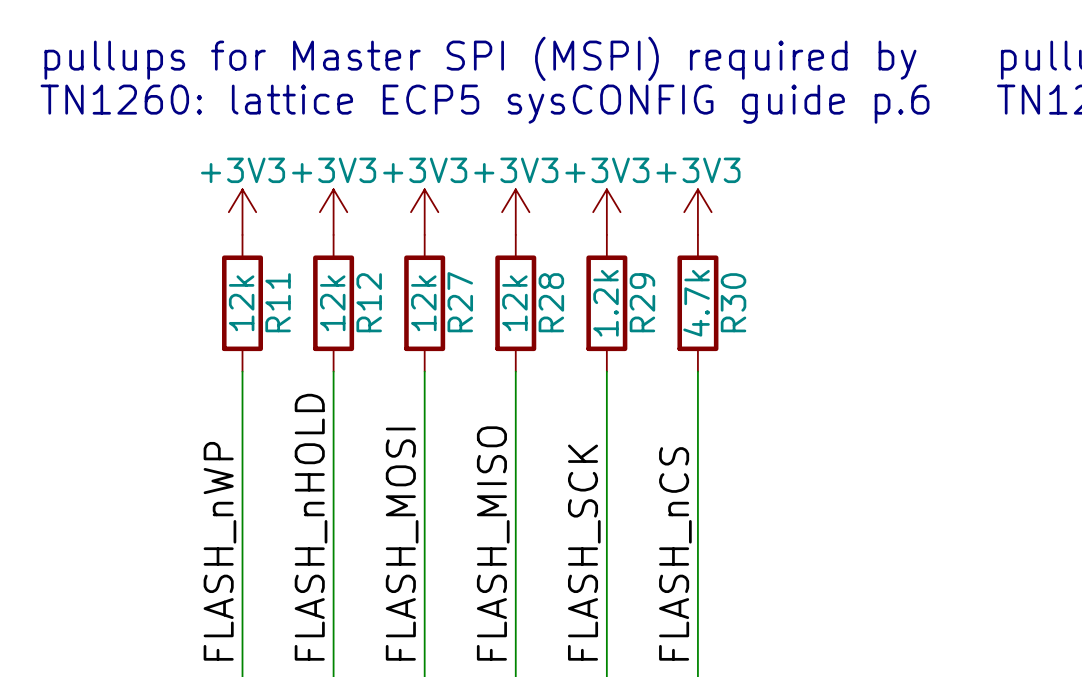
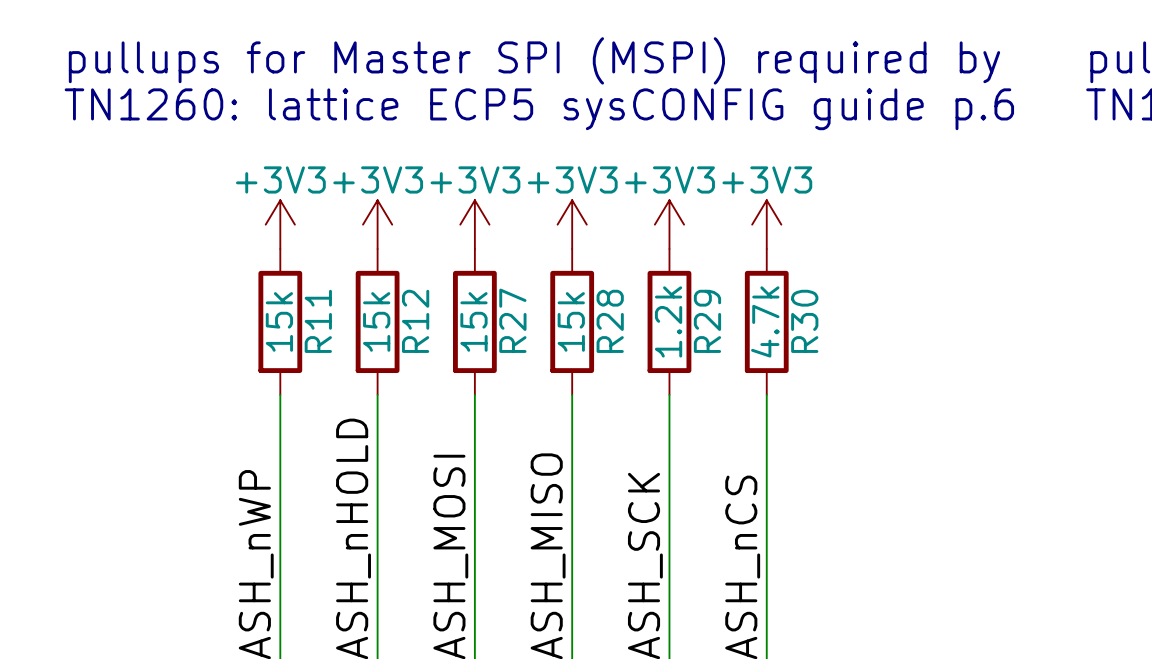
R11 value: 12k (241, 303) -> 15k (279, 321)
R12 value: 12k (332, 303) -> 15k (376, 321)
R27 value: 12k (423, 303) -> 15k (473, 321)
R28 value: 12k (514, 303) -> 15k (571, 321)

